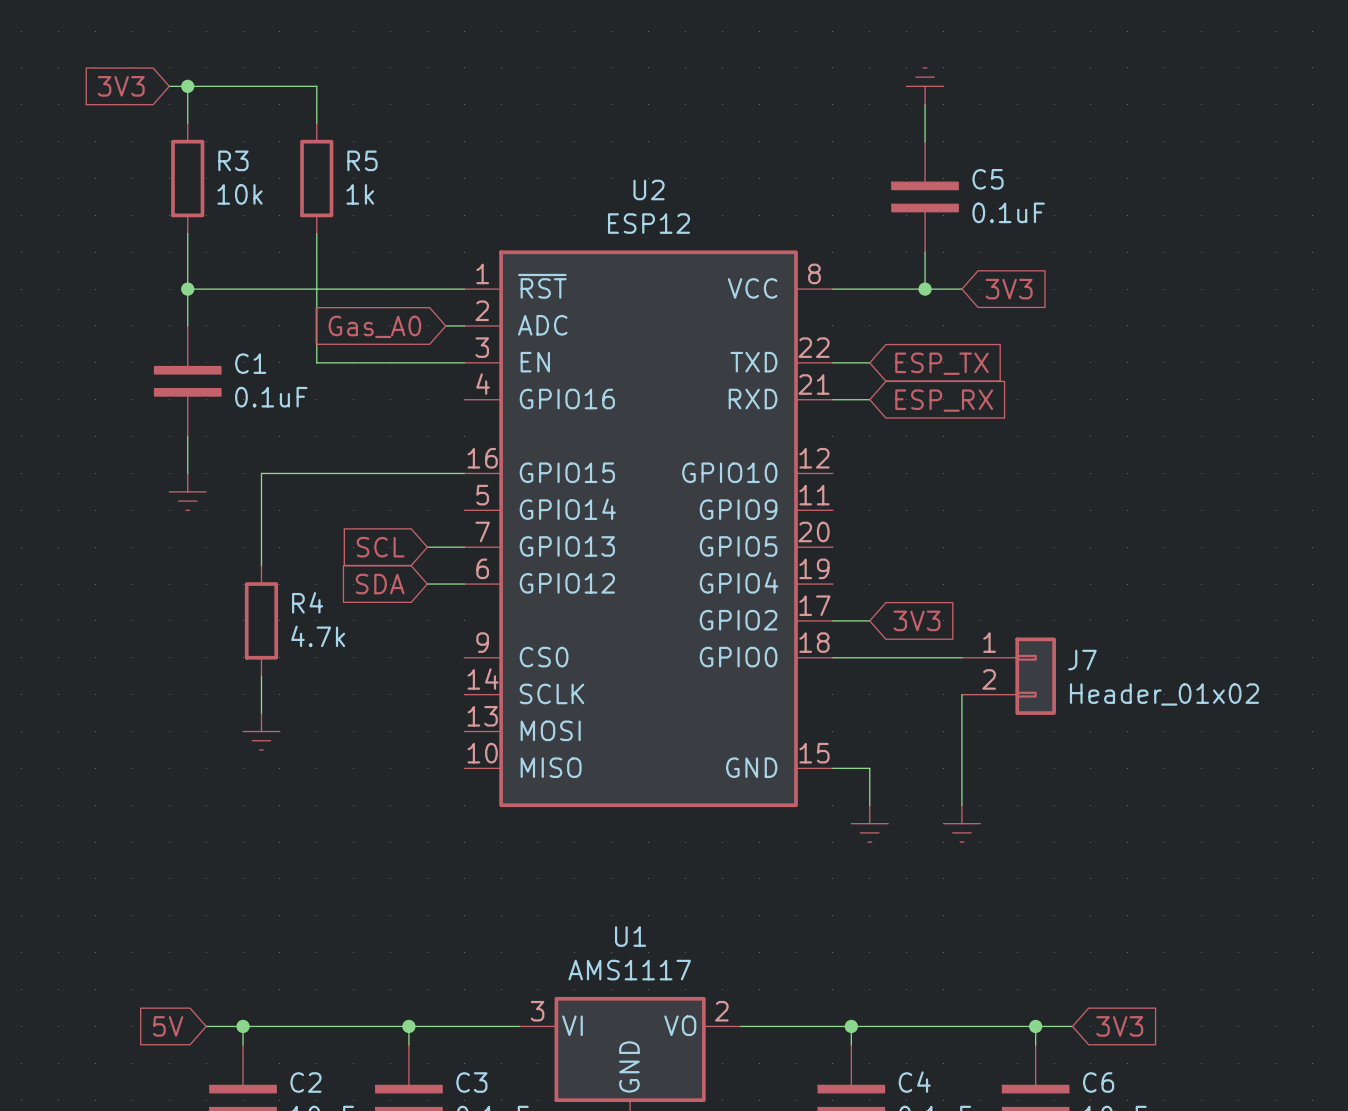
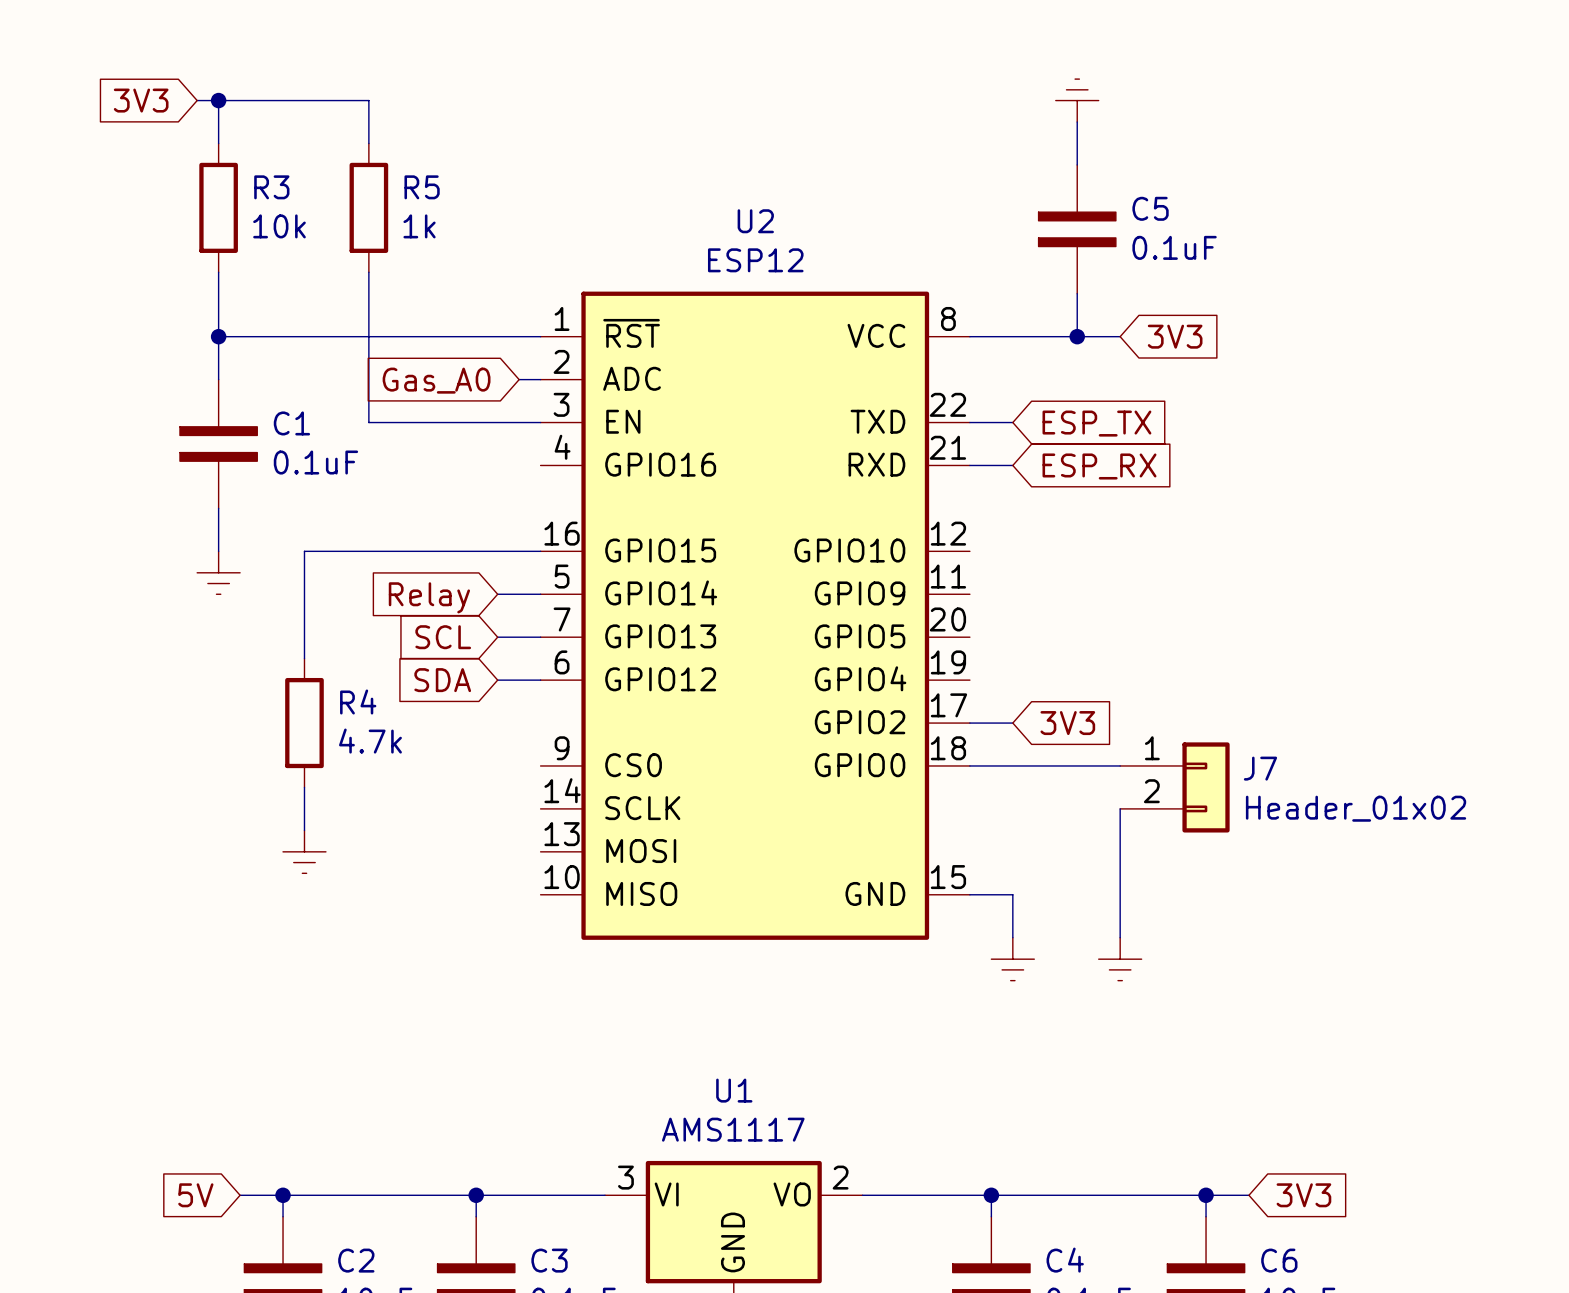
wire: none -> (497, 594) (540, 594)
global label: none -> Relay (429, 597)

